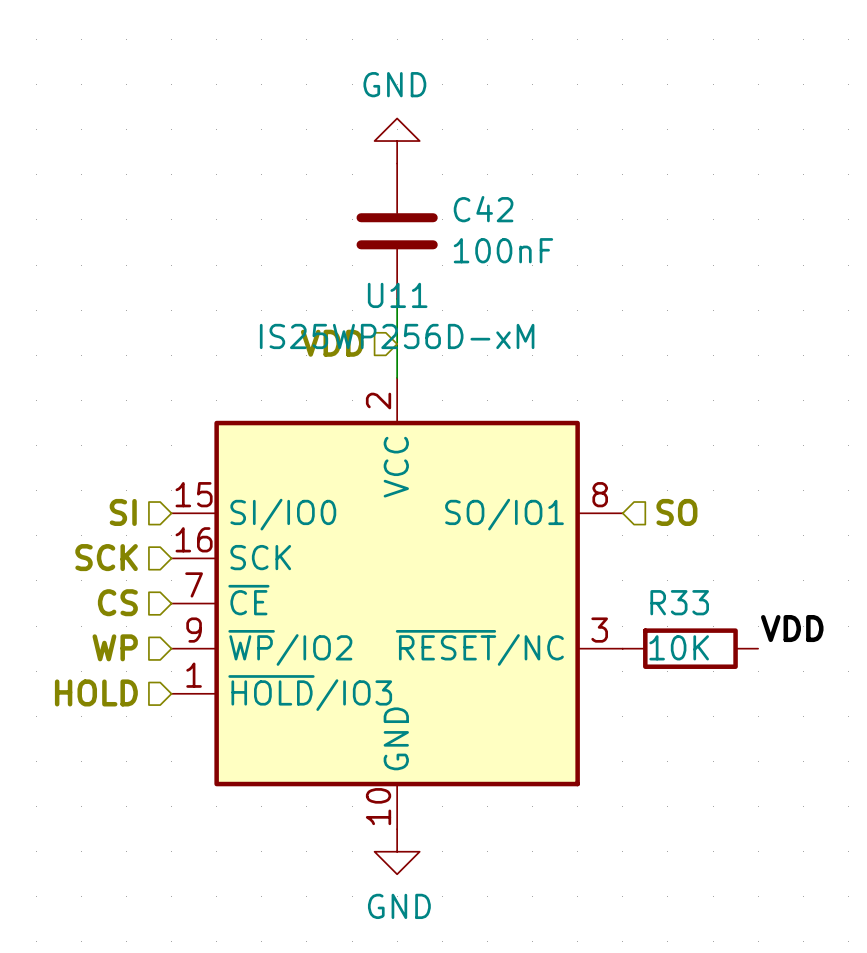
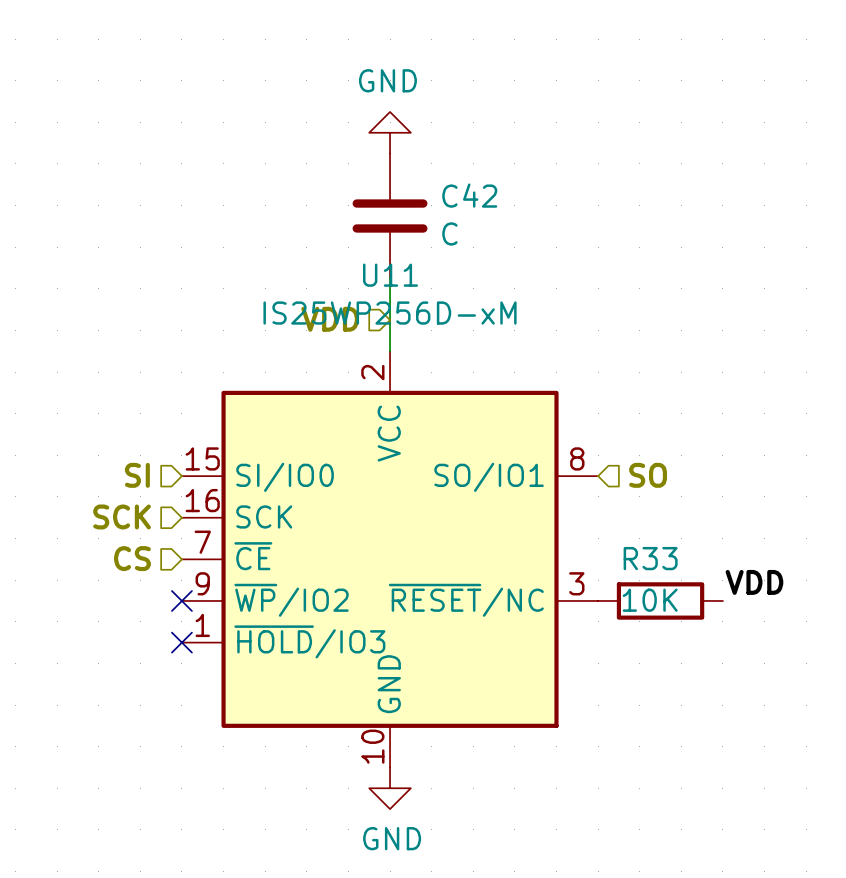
C42 value: 100nF (503, 250) -> C (449, 233)
hierarchical label: WP (115, 647) -> none
no-connect mark: none -> (181, 600)
hierarchical label: HOLD (96, 692) -> none
no-connect mark: none -> (181, 642)

